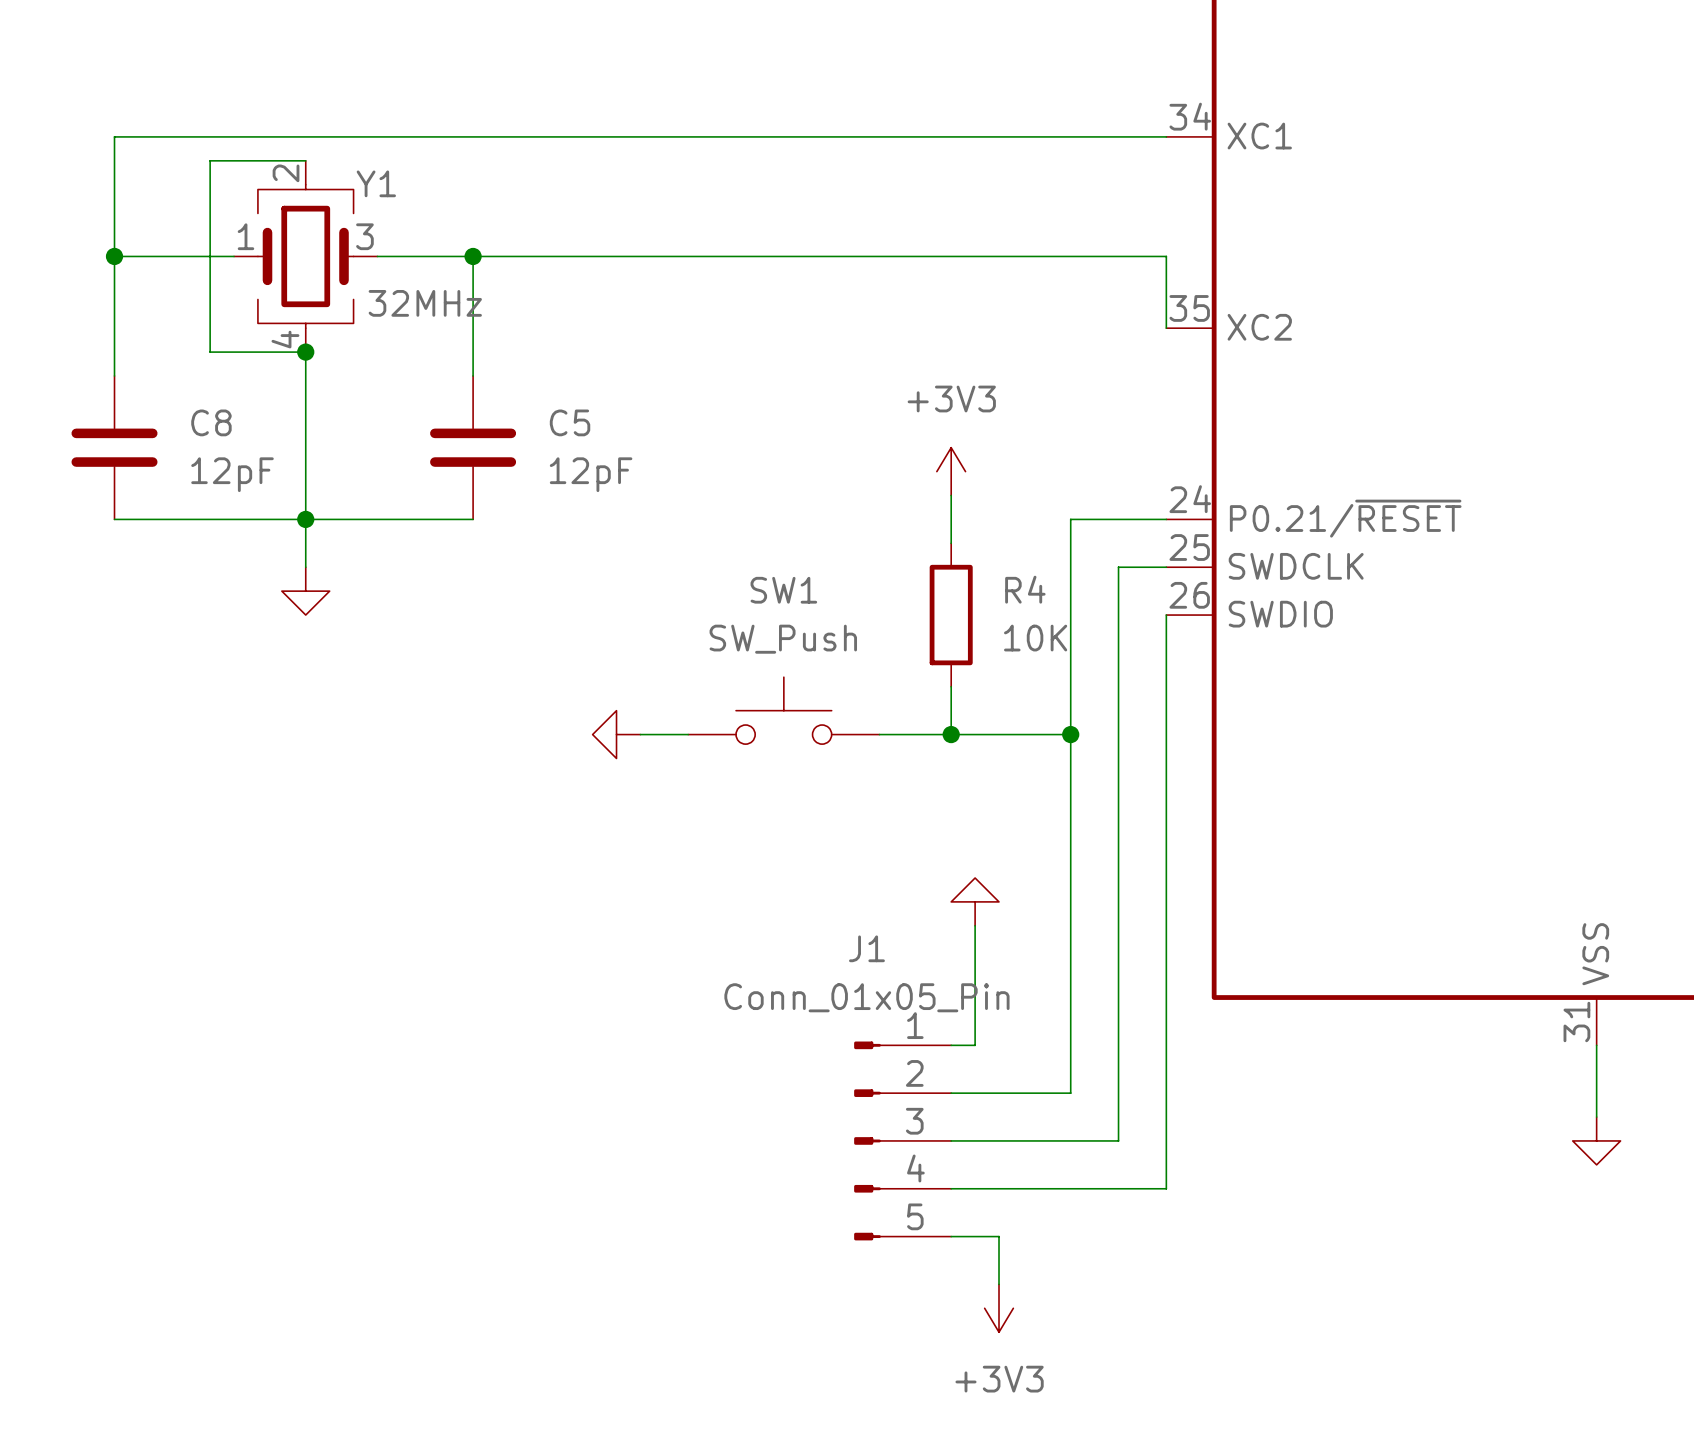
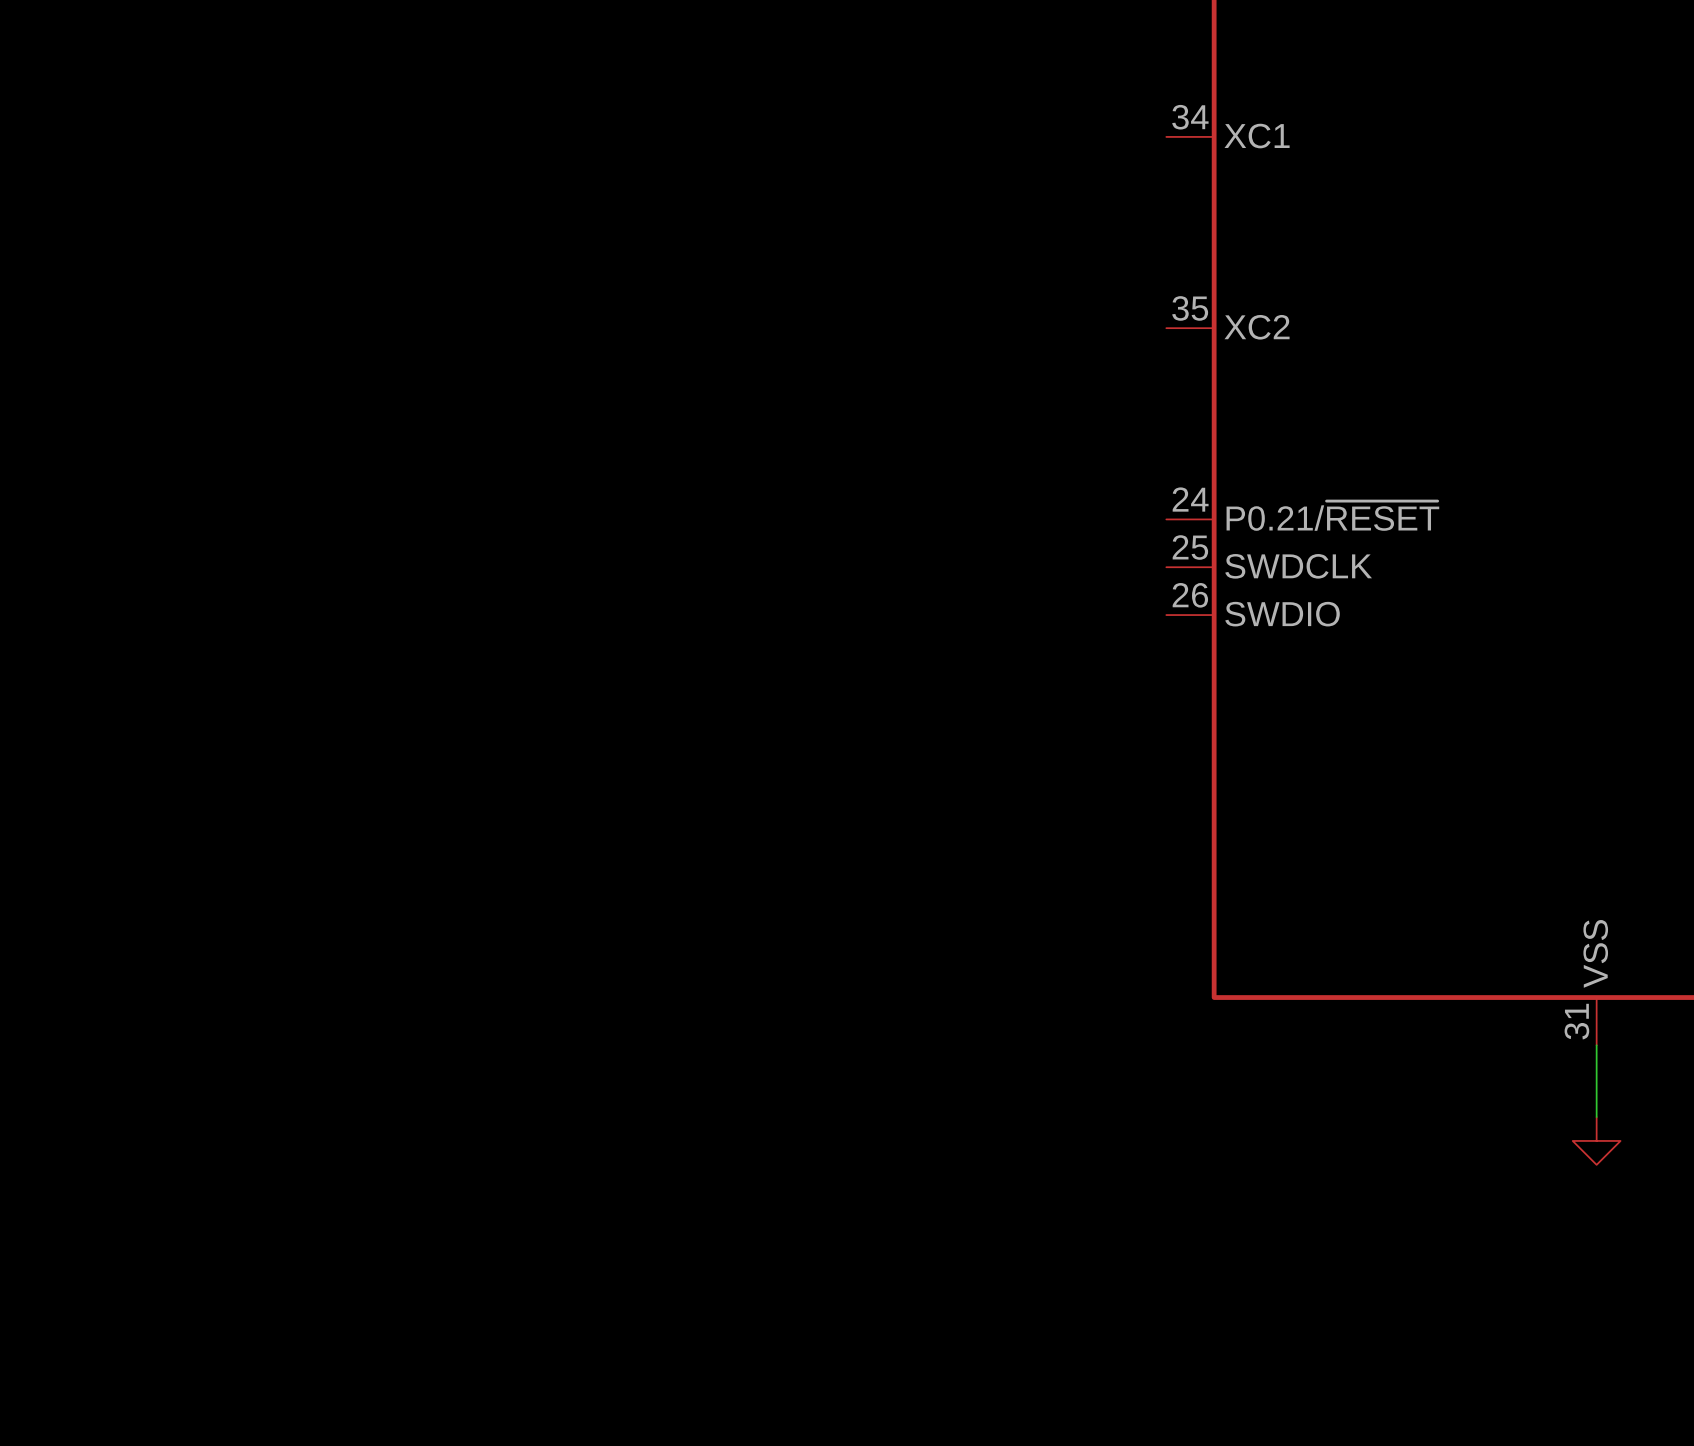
wire: (1166, 136) (114, 136) (114, 375) -> none
wire: (305, 160) (210, 160) (210, 352) (305, 352) (305, 567) -> none
wire: (114, 256) (234, 256) -> none
junction: (114, 256) -> none
Y1: 32MHz (305, 256) -> none
wire: (377, 256) (1166, 256) (1166, 328) -> none
wire: (473, 256) (473, 375) -> none
junction: (473, 256) -> none
junction: (305, 352) -> none
C8: 12pF (114, 447) -> none
C5: 12pF (473, 447) -> none
power symbol: +3V3 (951, 471) -> none
wire: (951, 495) (951, 543) -> none
wire: (114, 519) (473, 519) -> none
junction: (305, 519) -> none
wire: (1166, 519) (1070, 519) (1070, 1093) (951, 1093) -> none
wire: (1166, 567) (1118, 567) (1118, 1140) (951, 1140) -> none
power symbol: (305, 591) -> none
R4: 10K (951, 615) -> none
wire: (1166, 615) (1166, 1188) (951, 1188) -> none
wire: (951, 686) (951, 734) -> none
SW1: SW_Push (783, 710) -> none
power symbol: (616, 734) -> none
wire: (640, 734) (688, 734) -> none
wire: (879, 734) (1070, 734) -> none
junction: (951, 734) -> none
junction: (1070, 734) -> none
power symbol: (975, 901) -> none
wire: (975, 925) (975, 1045) (951, 1045) -> none
J1: Conn_01x05_Pin (902, 1140) -> none
wire: (951, 1236) (999, 1236) (999, 1284) -> none
power symbol: +3V3 (999, 1308) -> none

